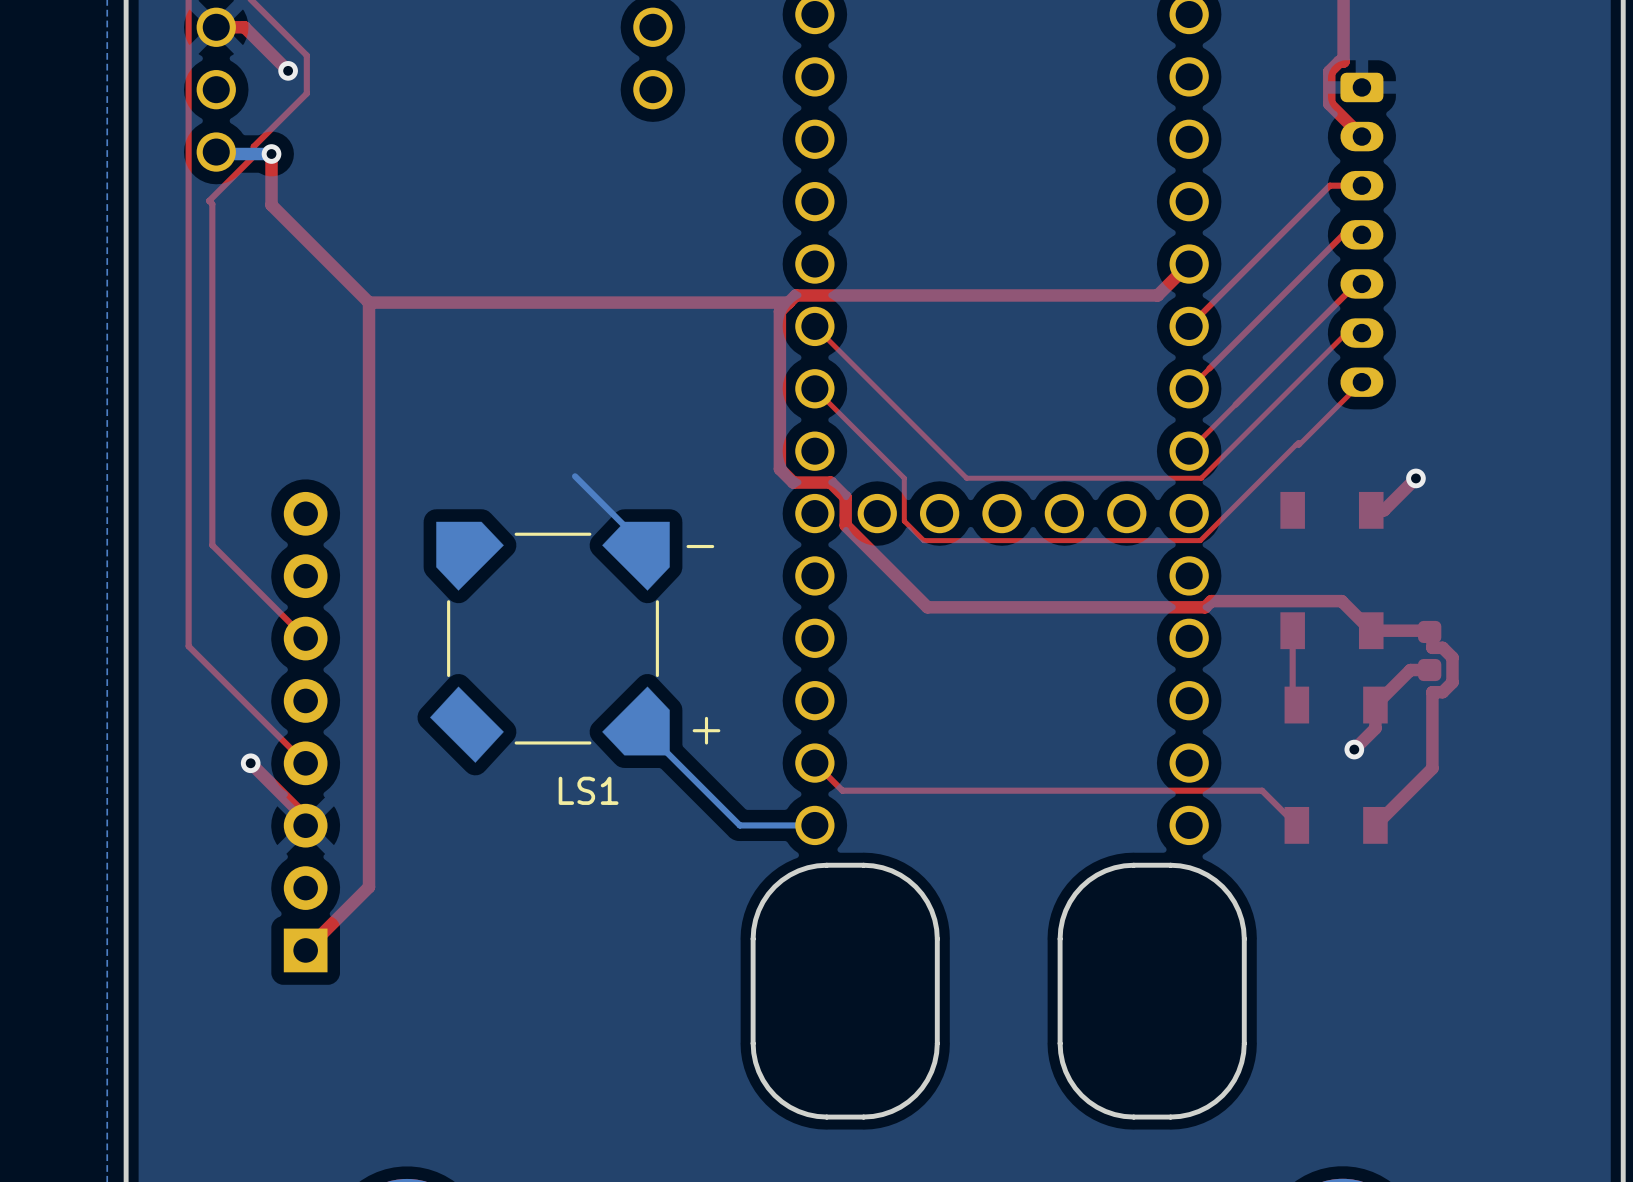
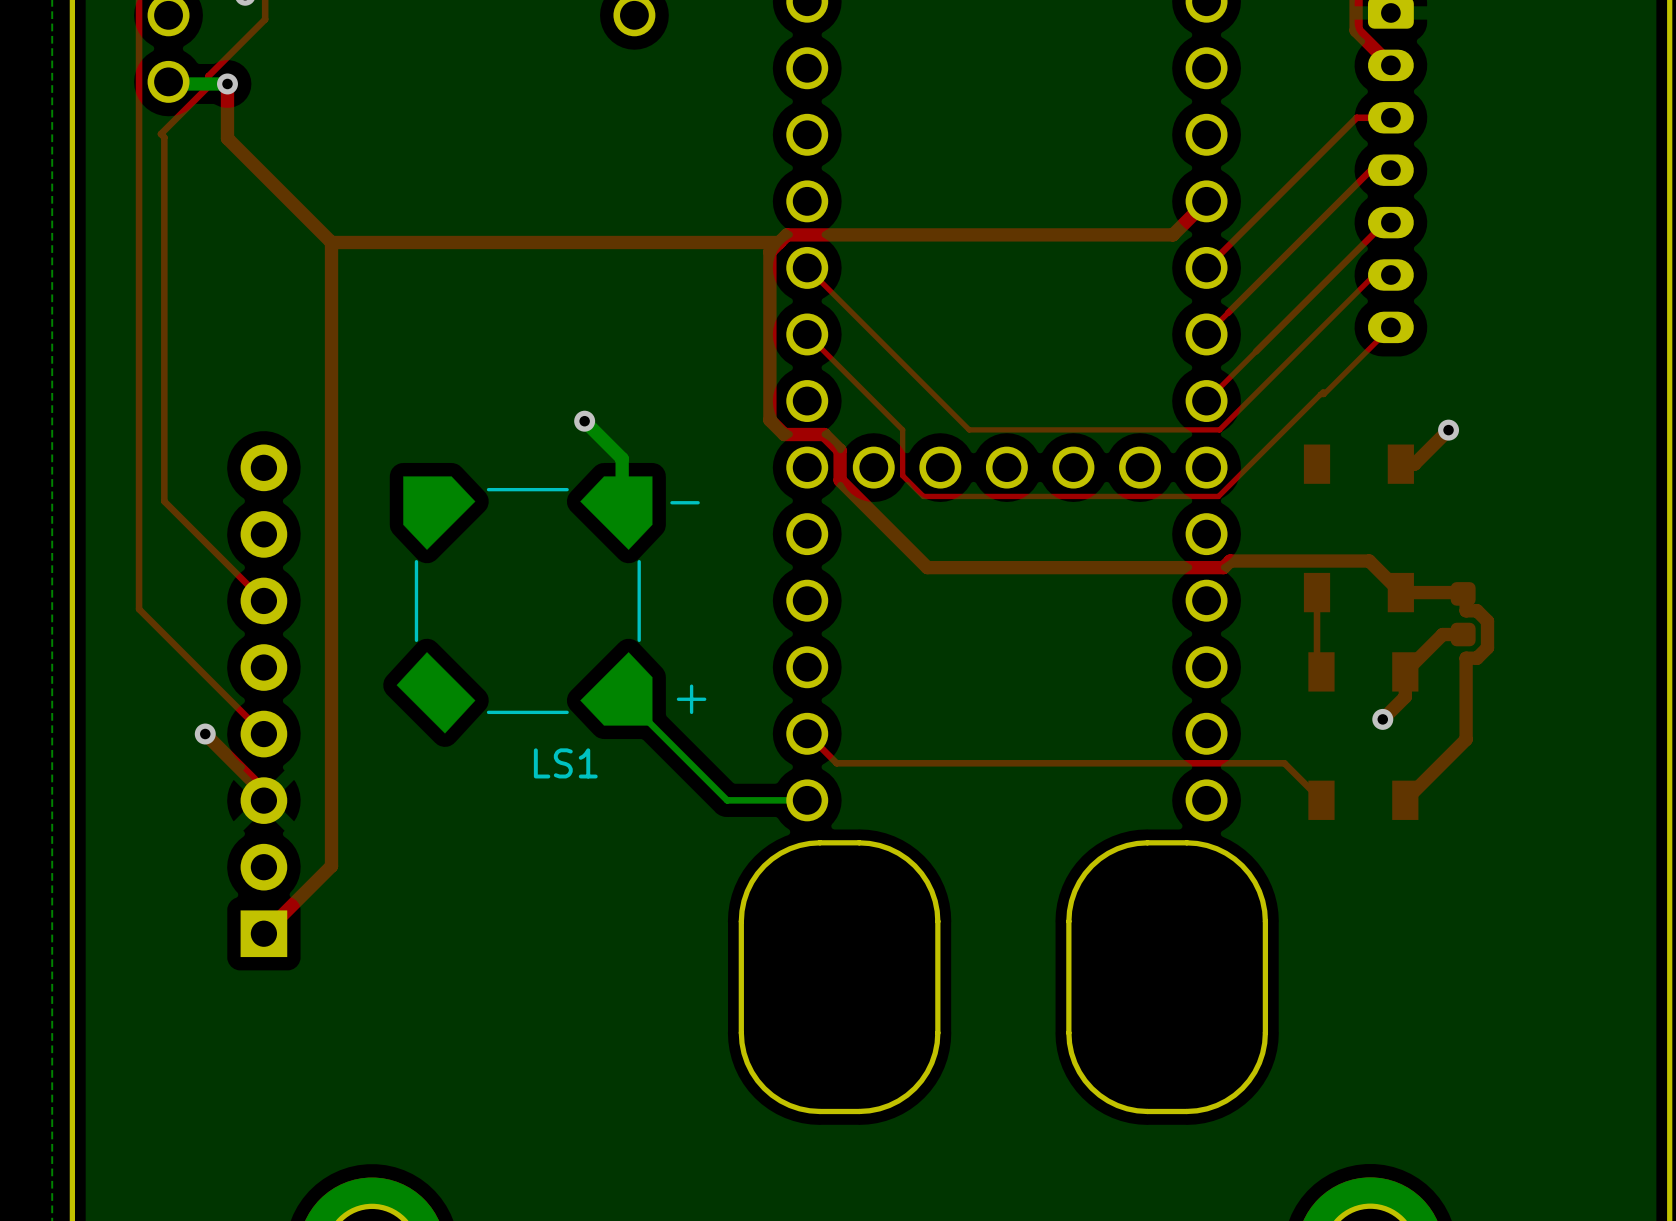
via: none -> (584, 421)
bottom track: (575, 476) (641, 542) -> (584, 421) (622, 458) (622, 498)

